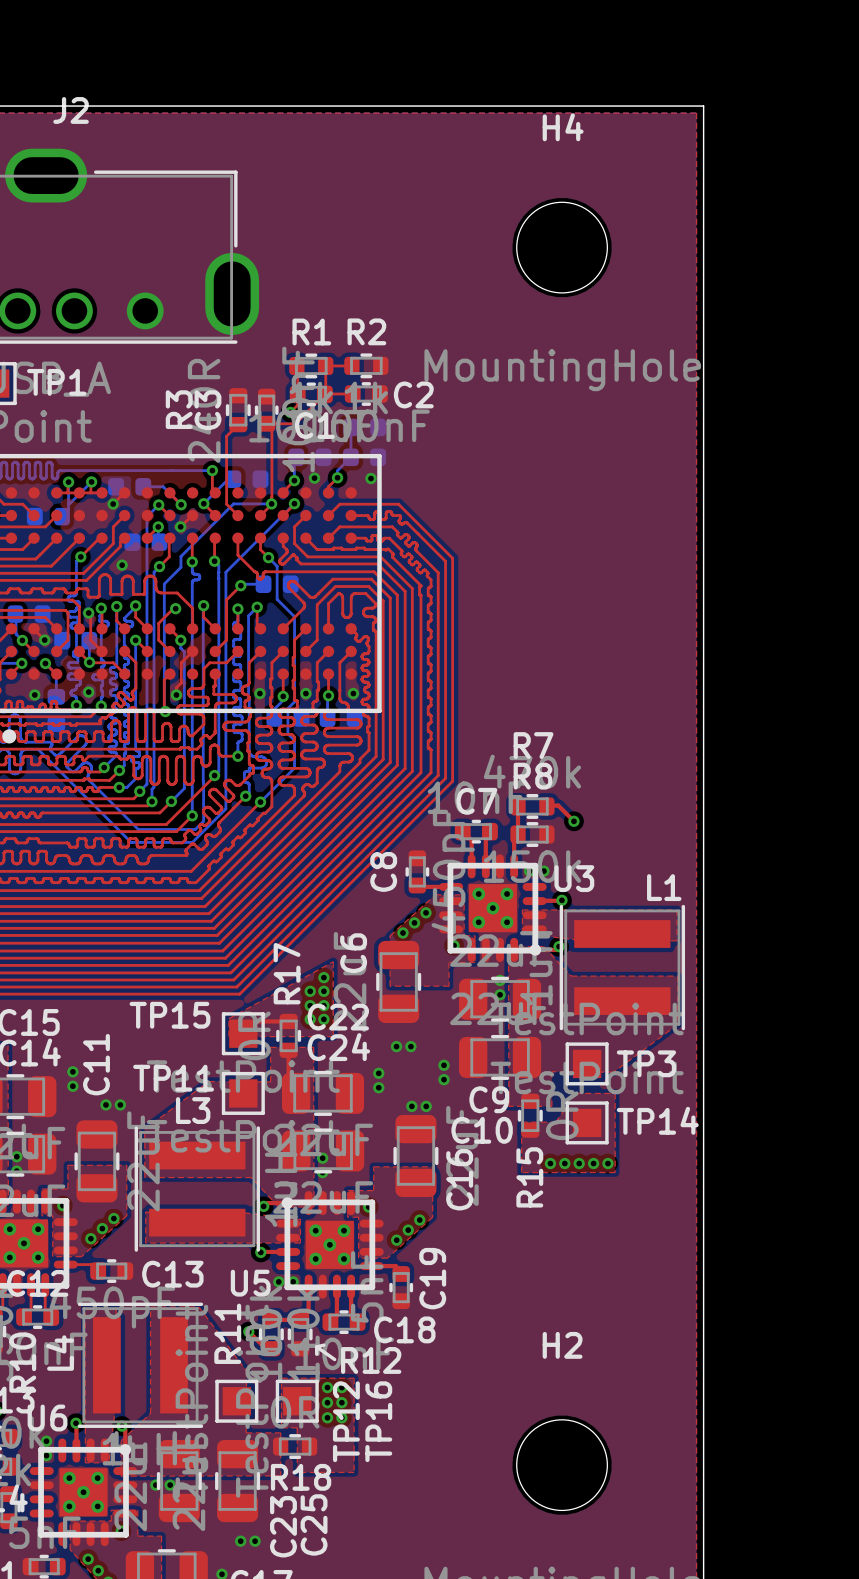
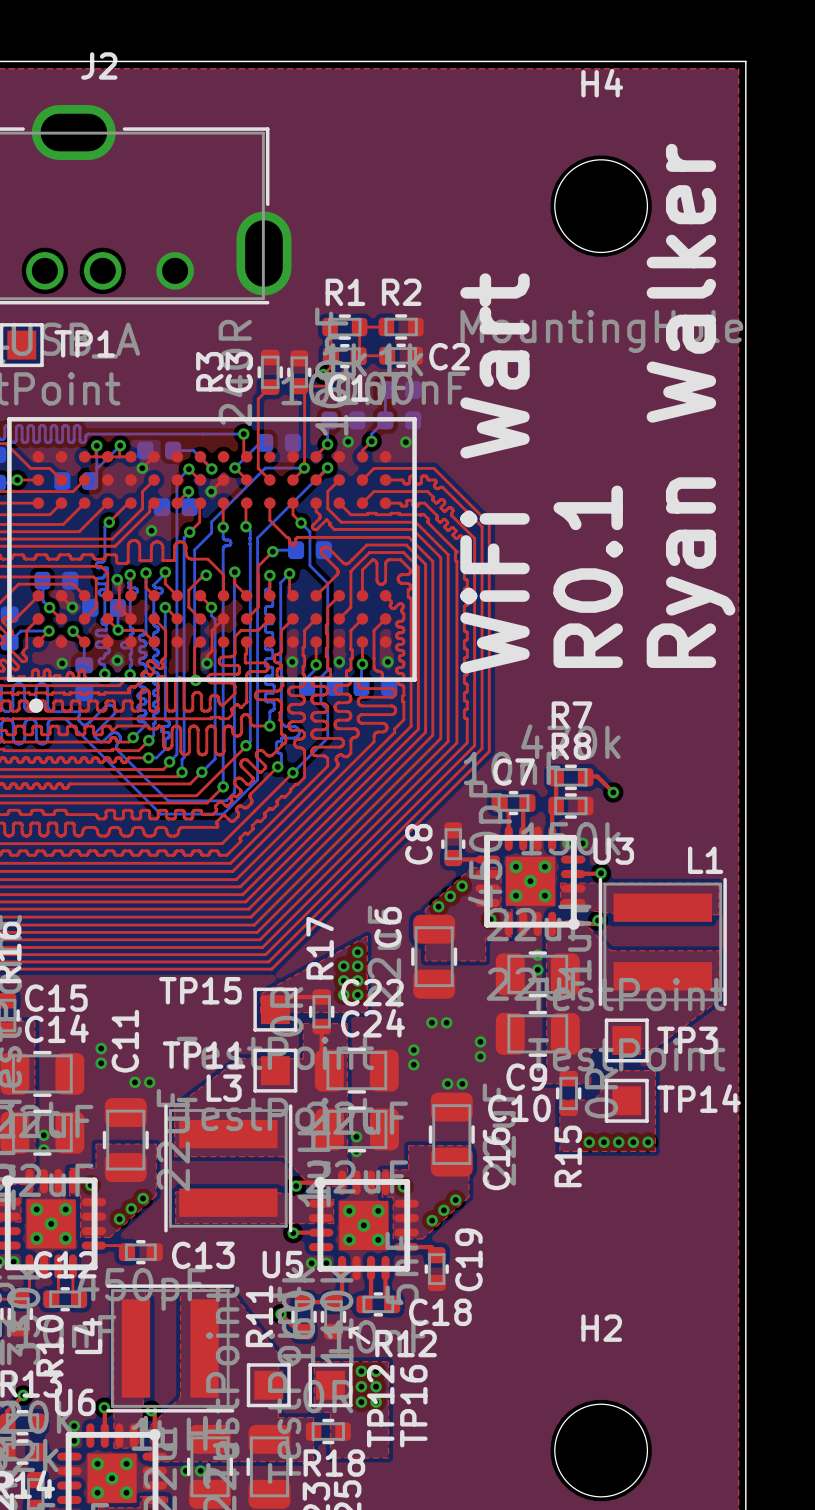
text: none -> Ryan Walker (691, 405)
text: none -> WiFi Wart (495, 473)
text: none -> R0.1 (588, 576)

